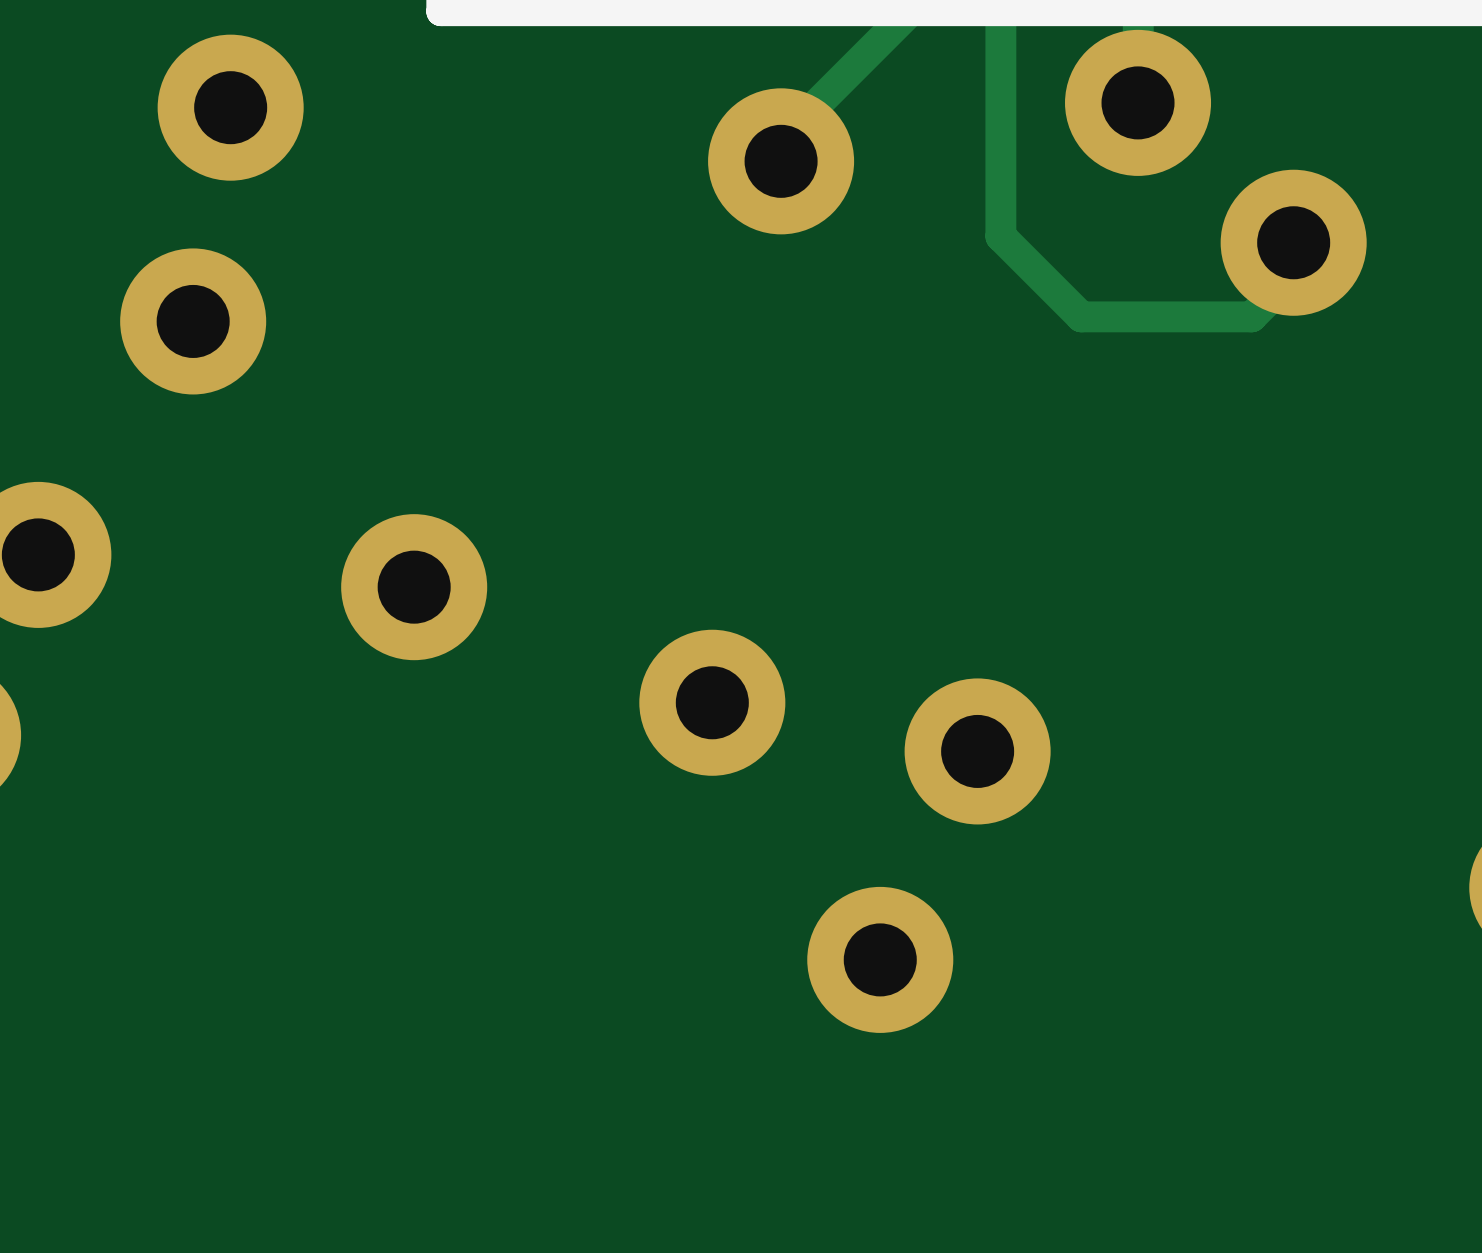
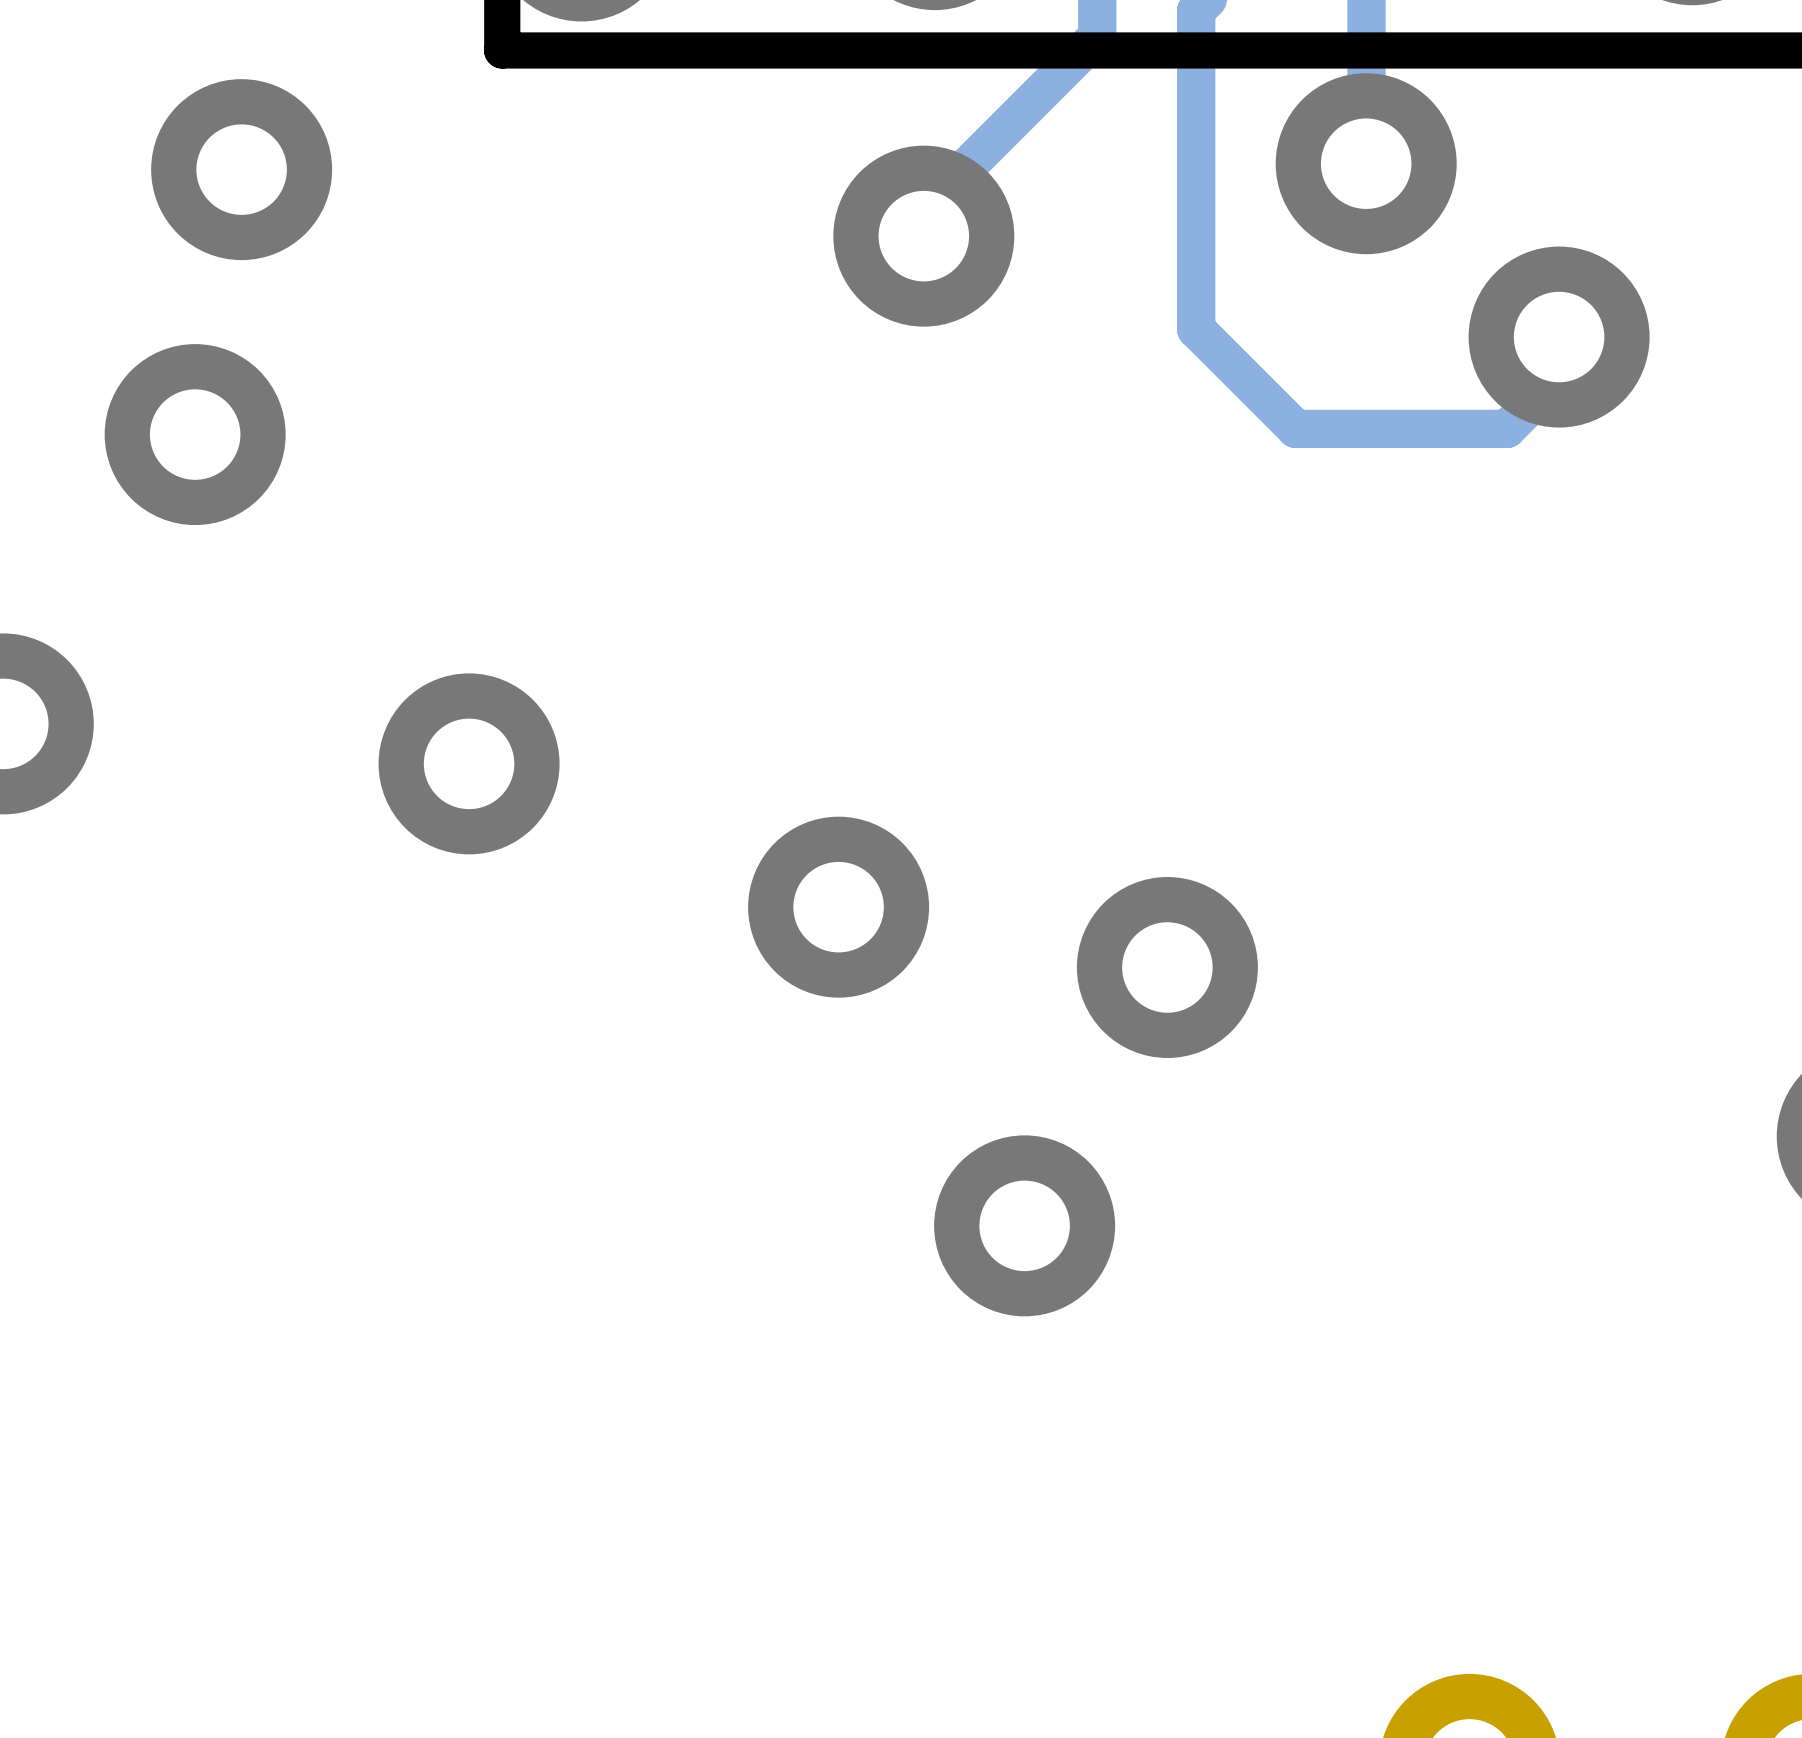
via position: (880, 959) -> (1024, 1225)

